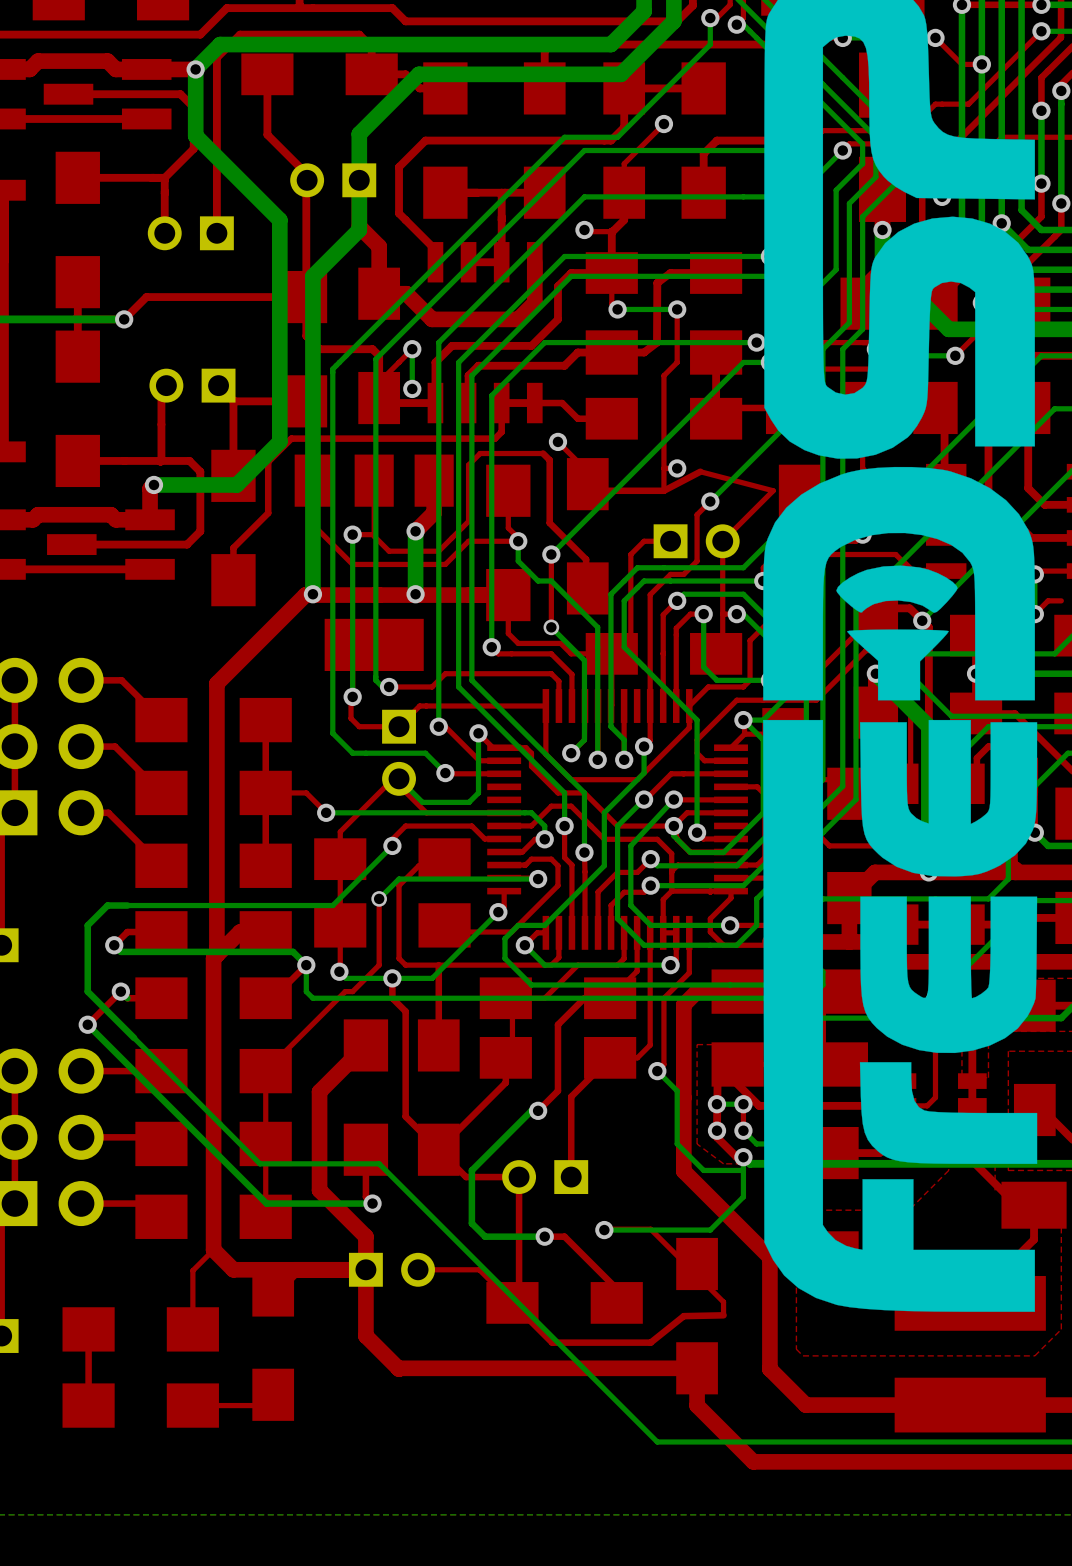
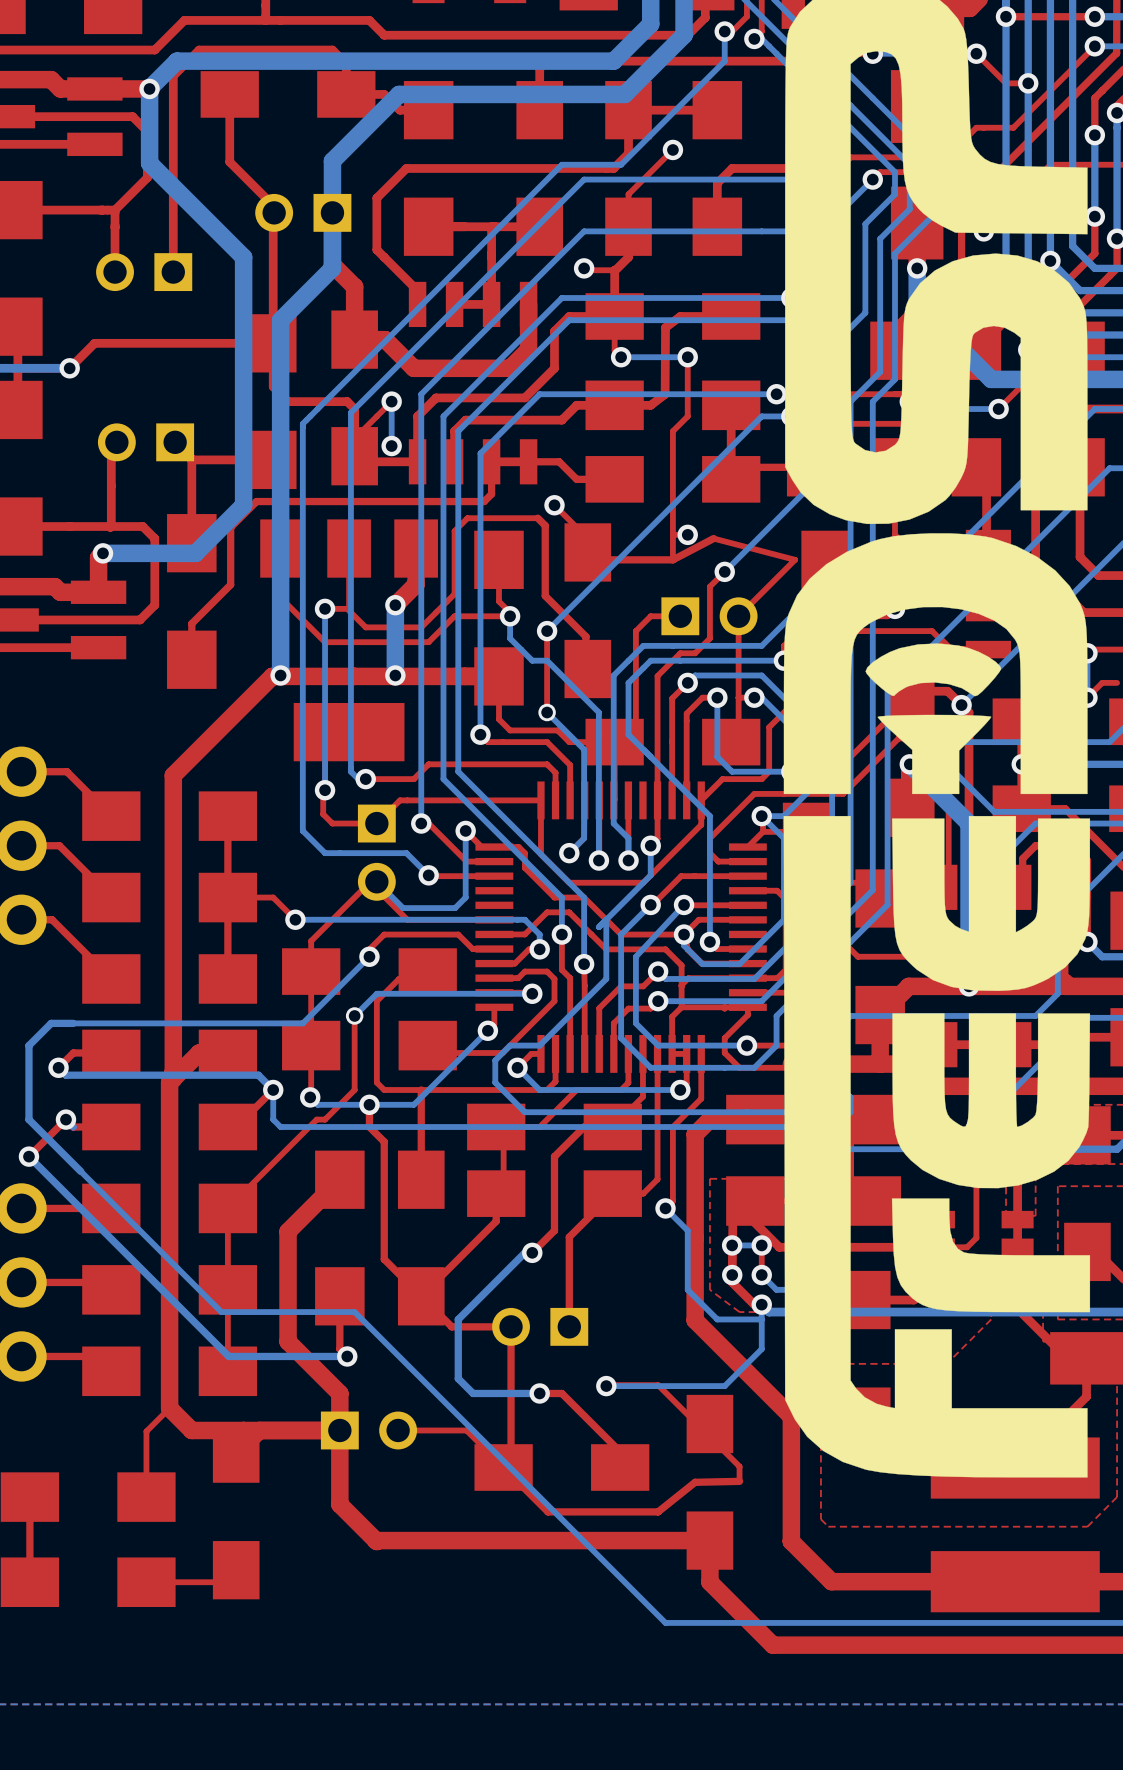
bottom track: none -> (606, 919) (598, 927)

